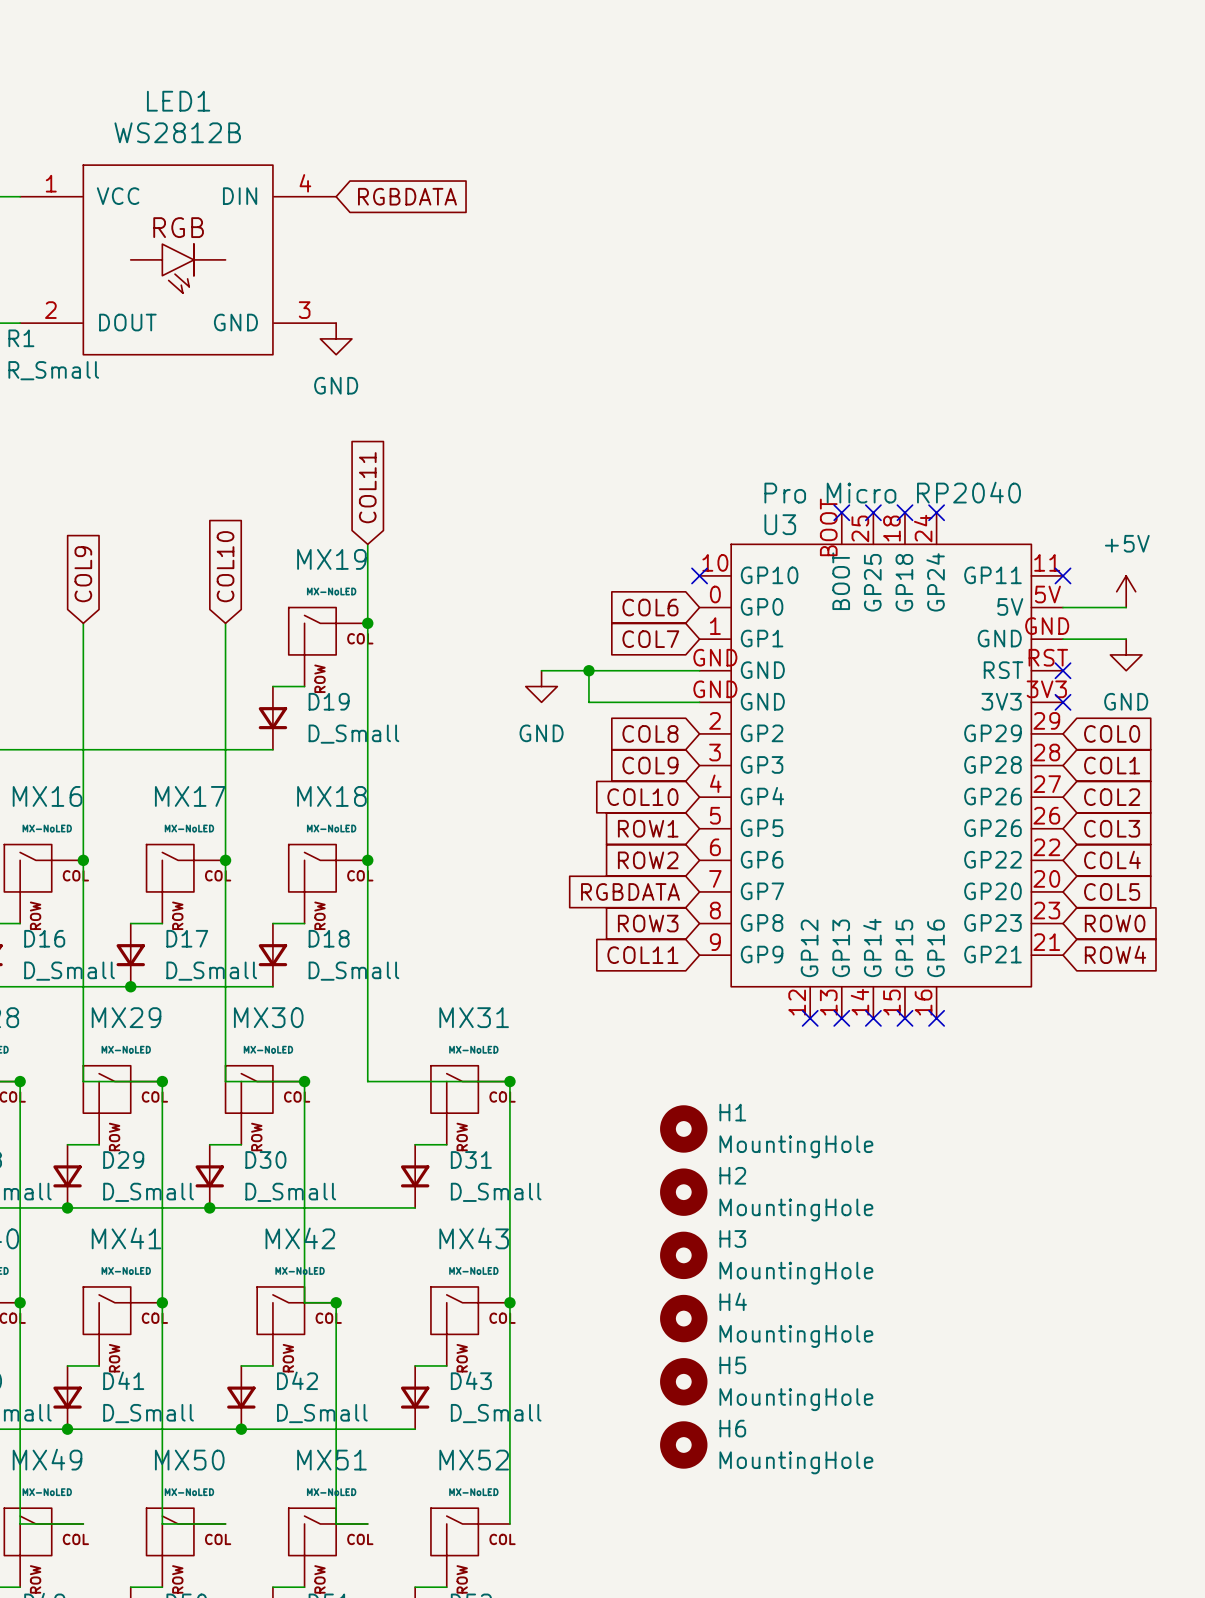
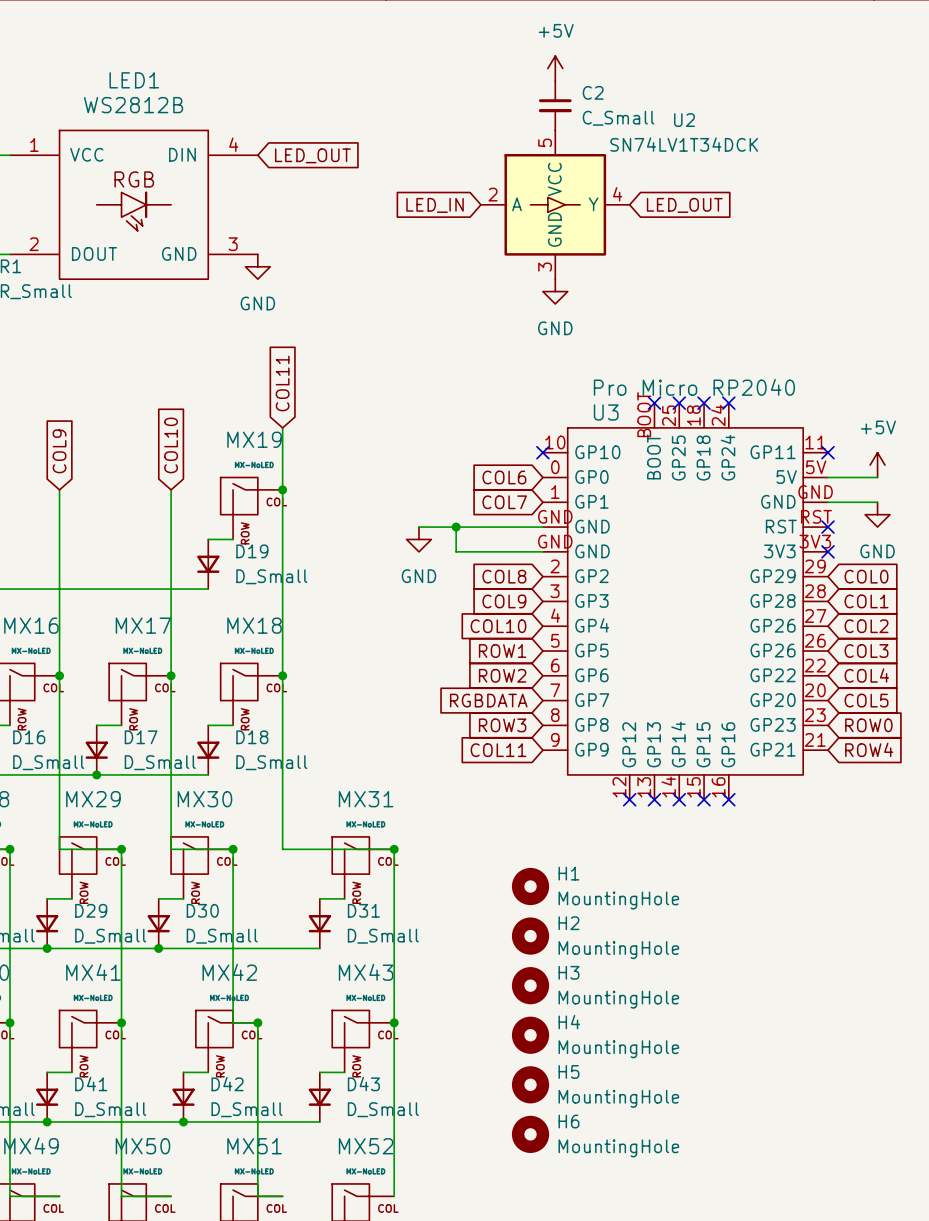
power symbol: none -> +5V (555, 68)
C2: none -> C_Small (555, 105)
global label: RGBDATA (407, 196) -> LED_OUT (312, 155)
U2: none -> SN74LV1T34DCK (555, 204)
global label: none -> LED_IN (435, 205)
global label: none -> LED_OUT (684, 205)
power symbol: none -> GND (555, 291)

